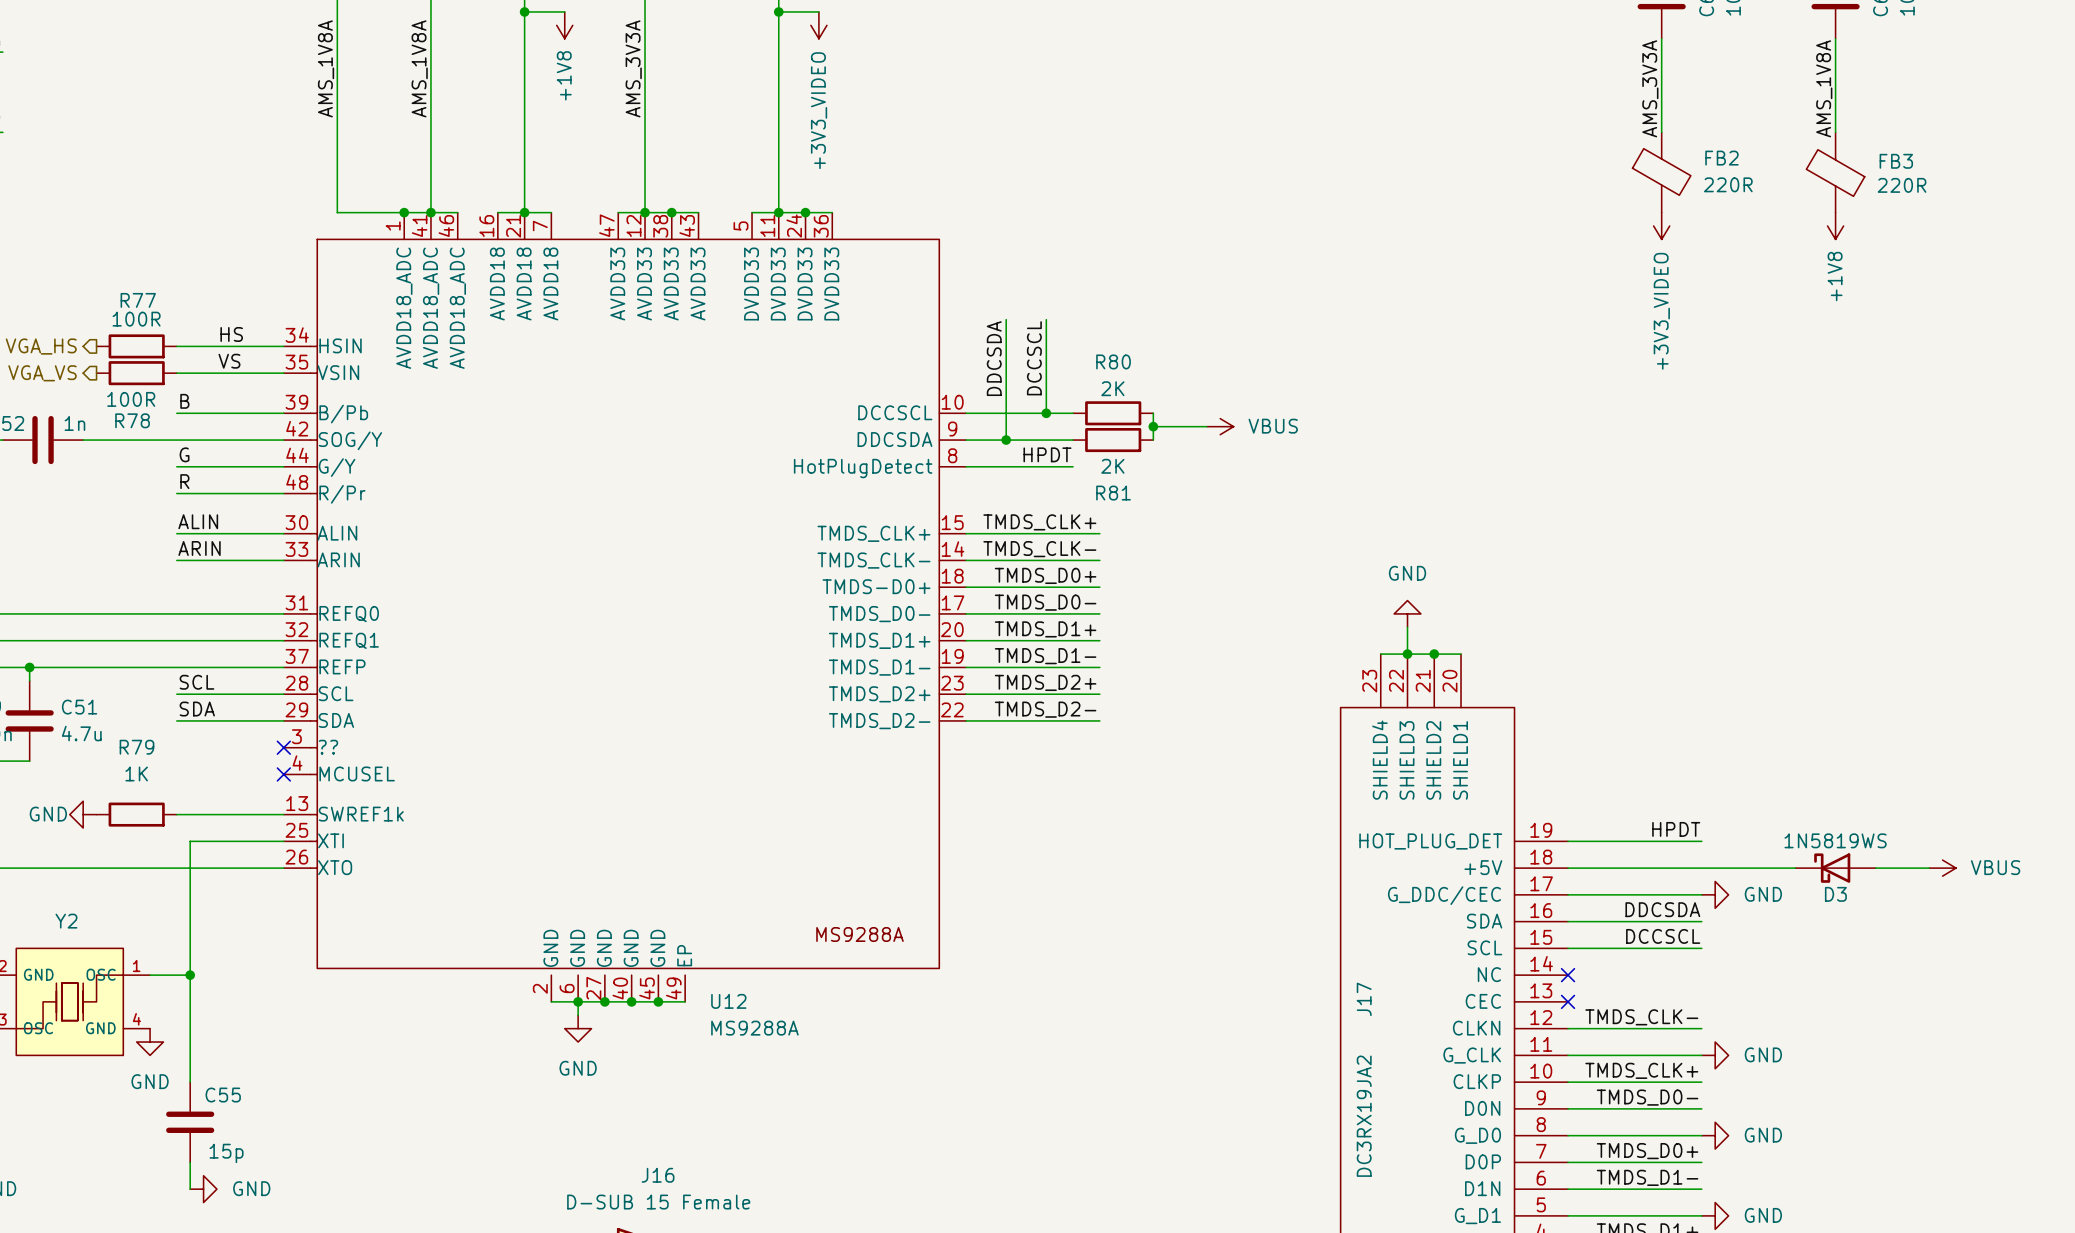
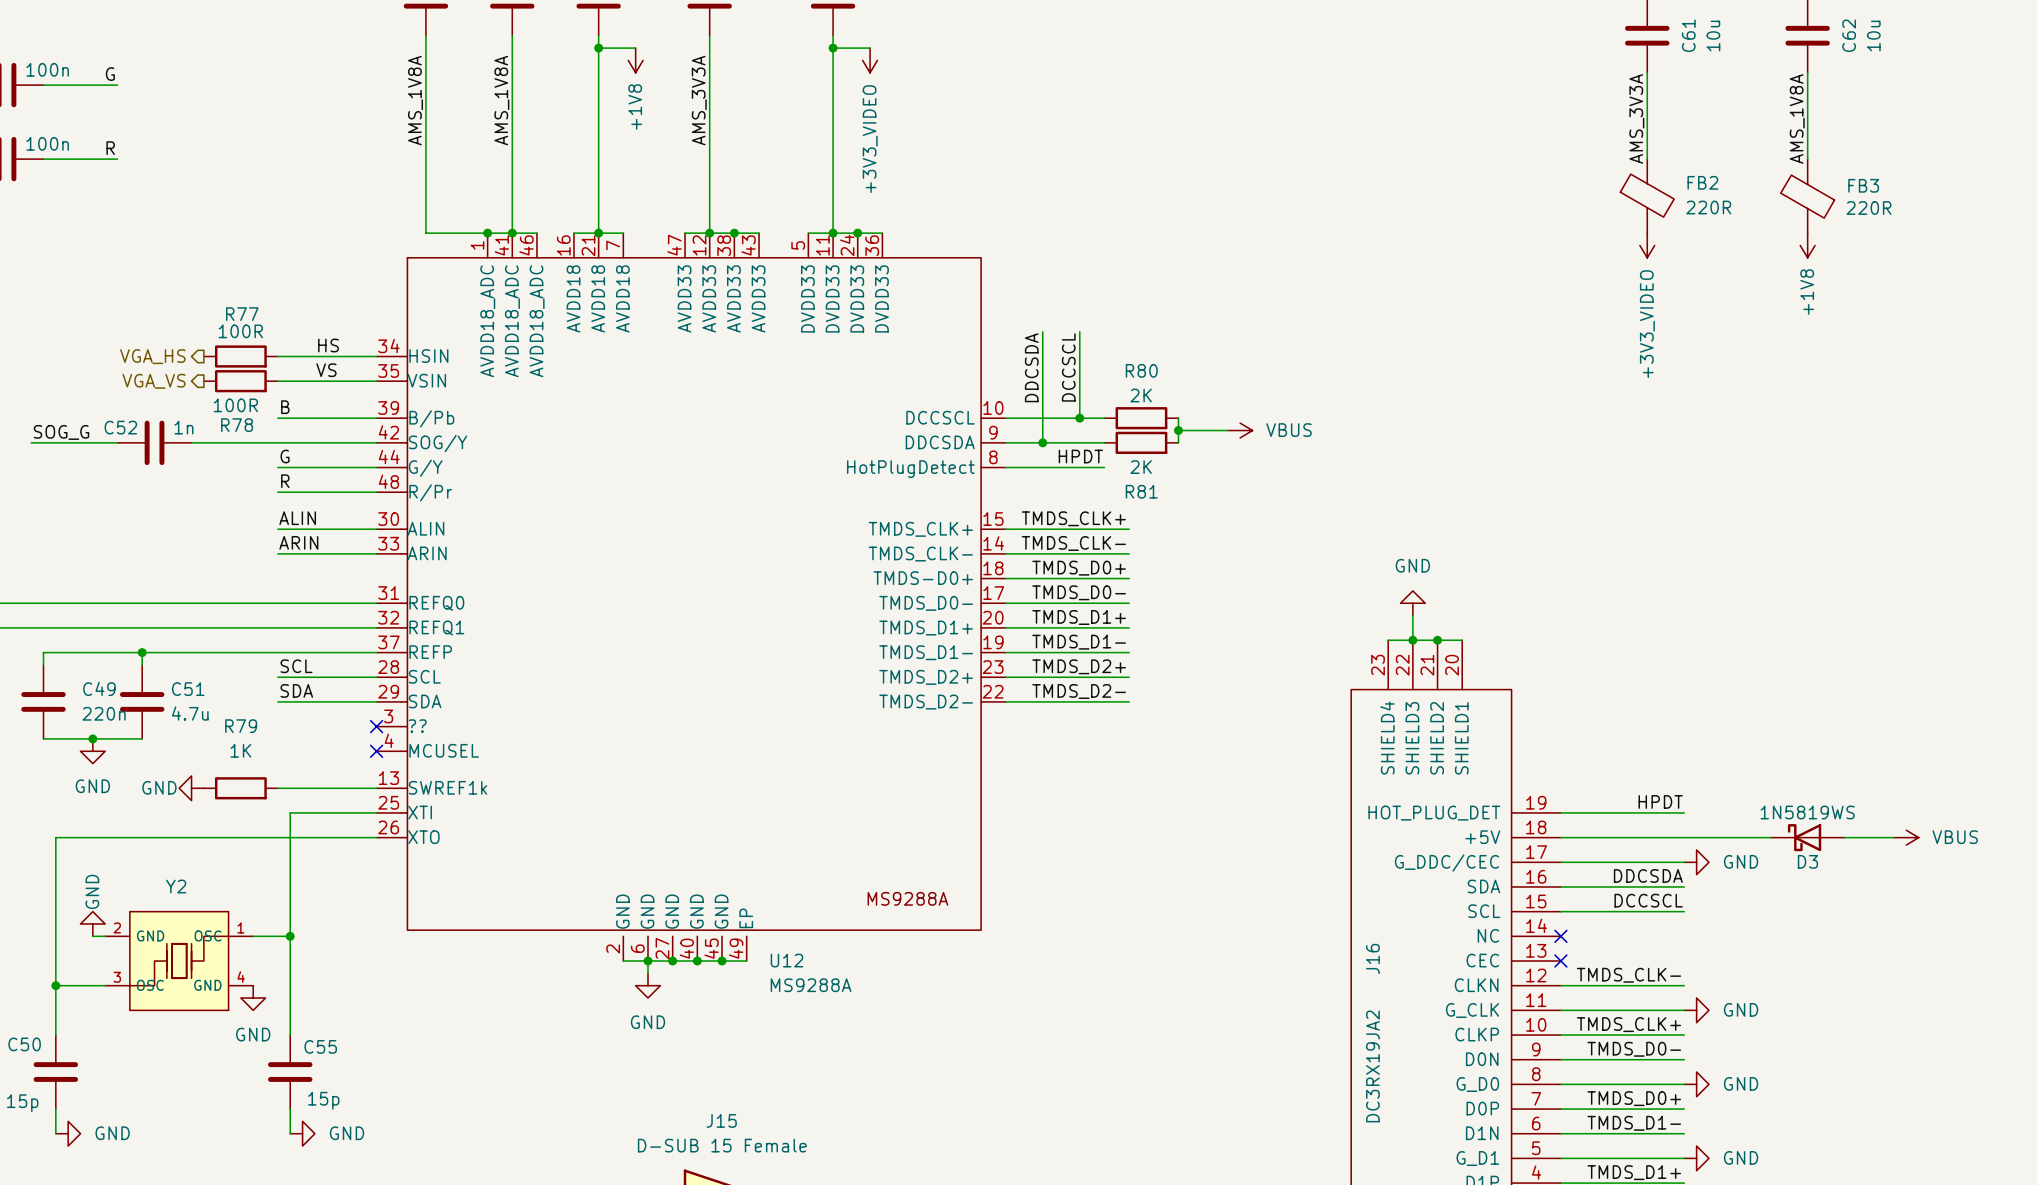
J17 name: J17 (1364, 999) -> J16 (1372, 958)
J16 name: J16 (658, 1175) -> J15 (721, 1120)

